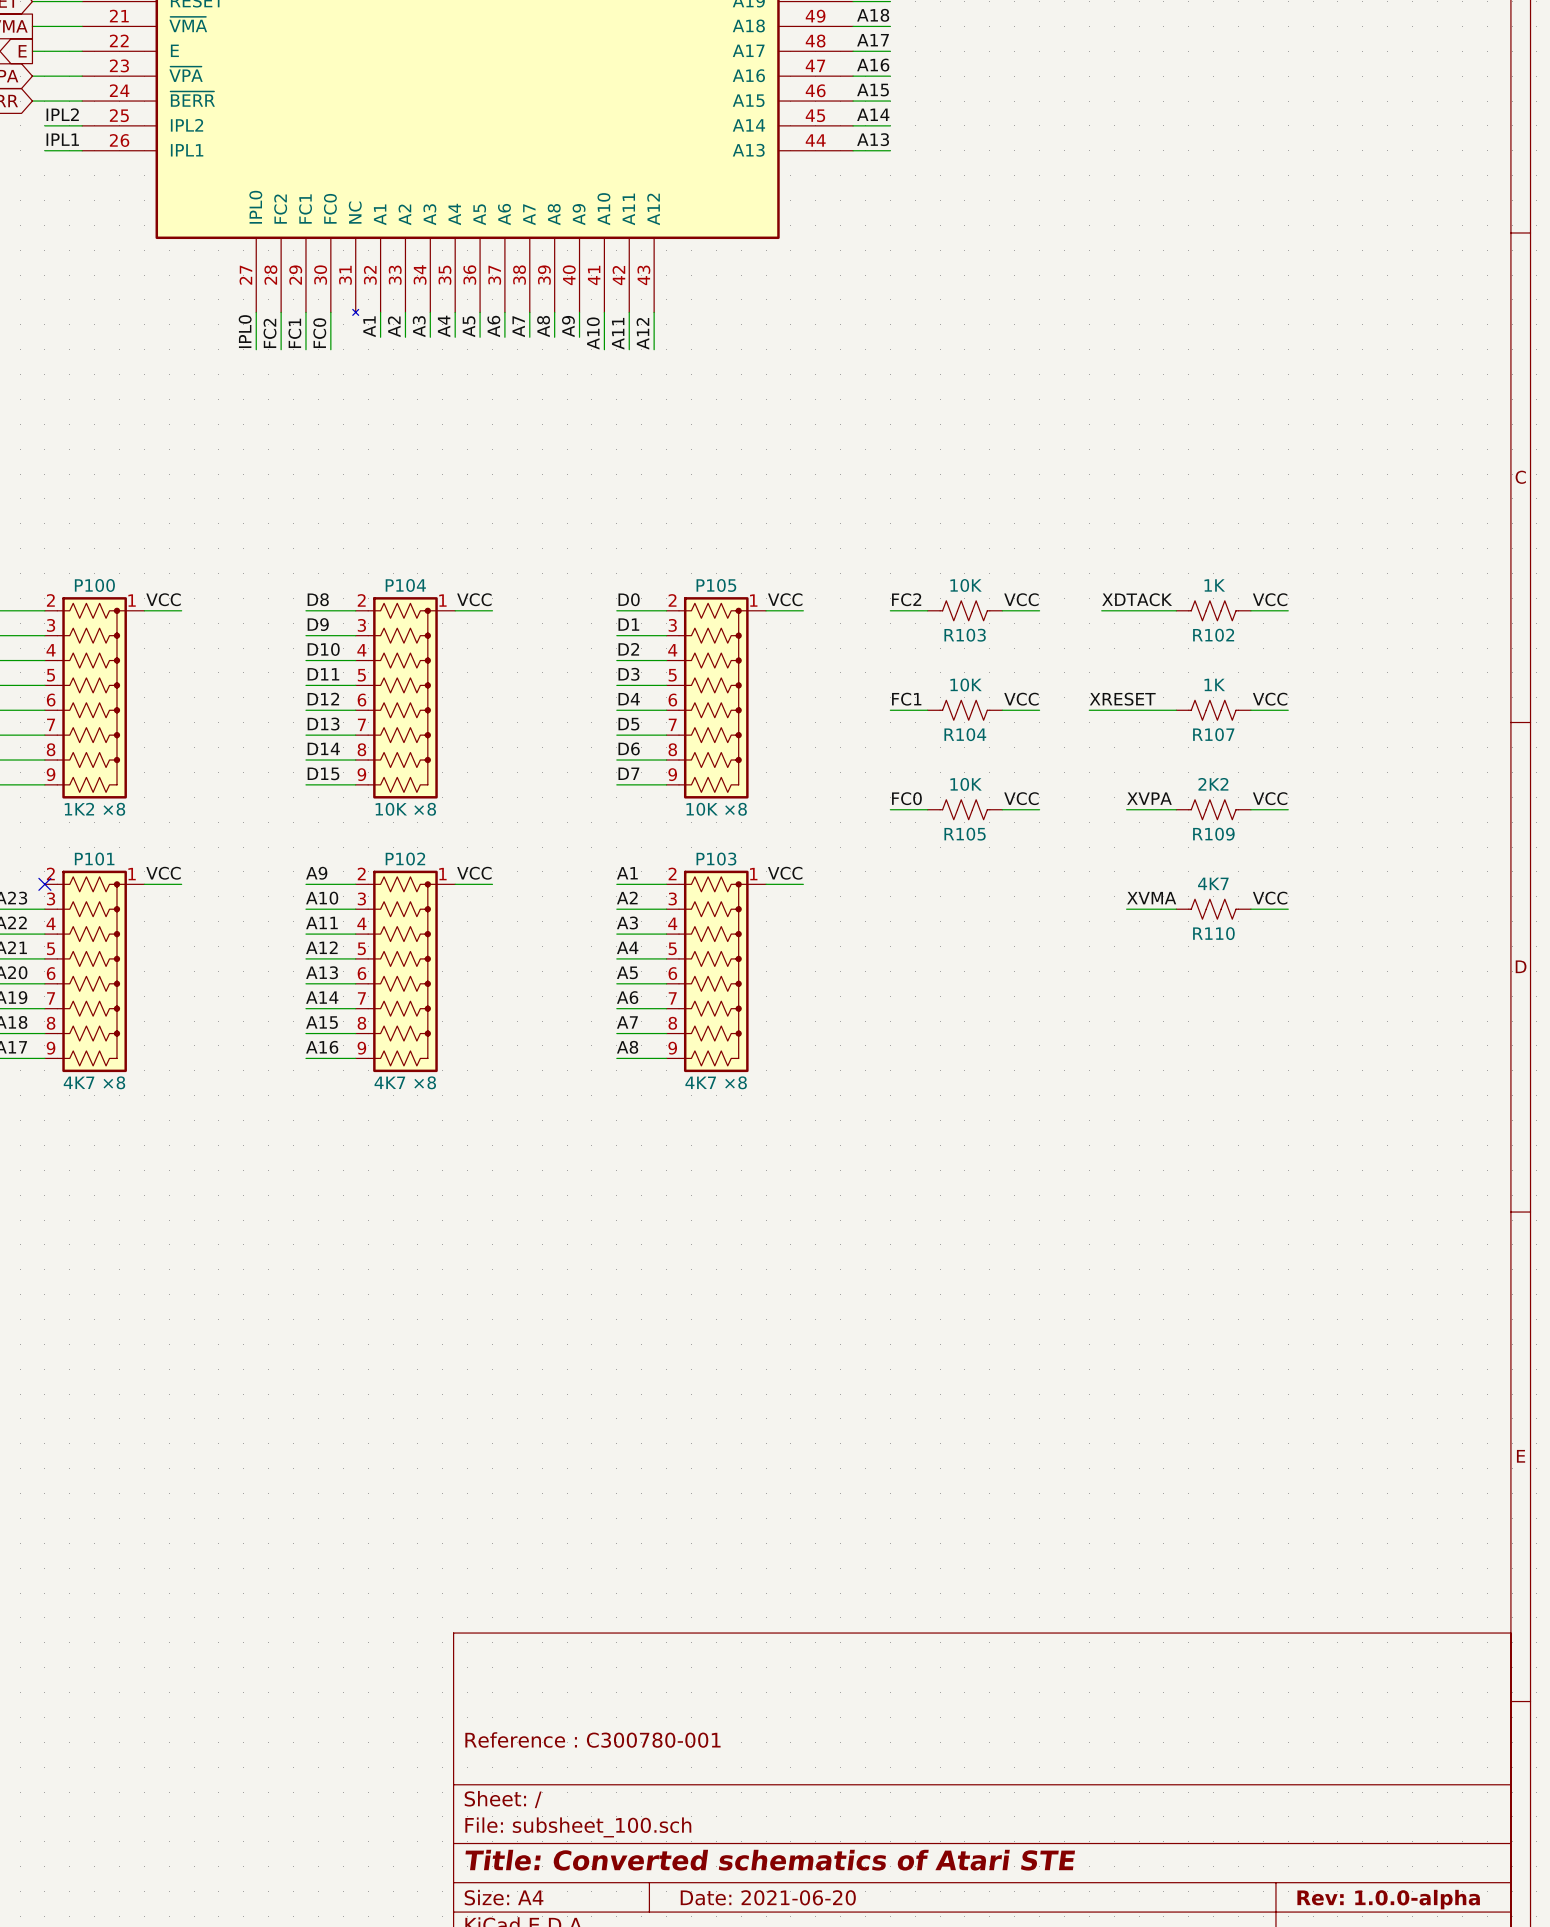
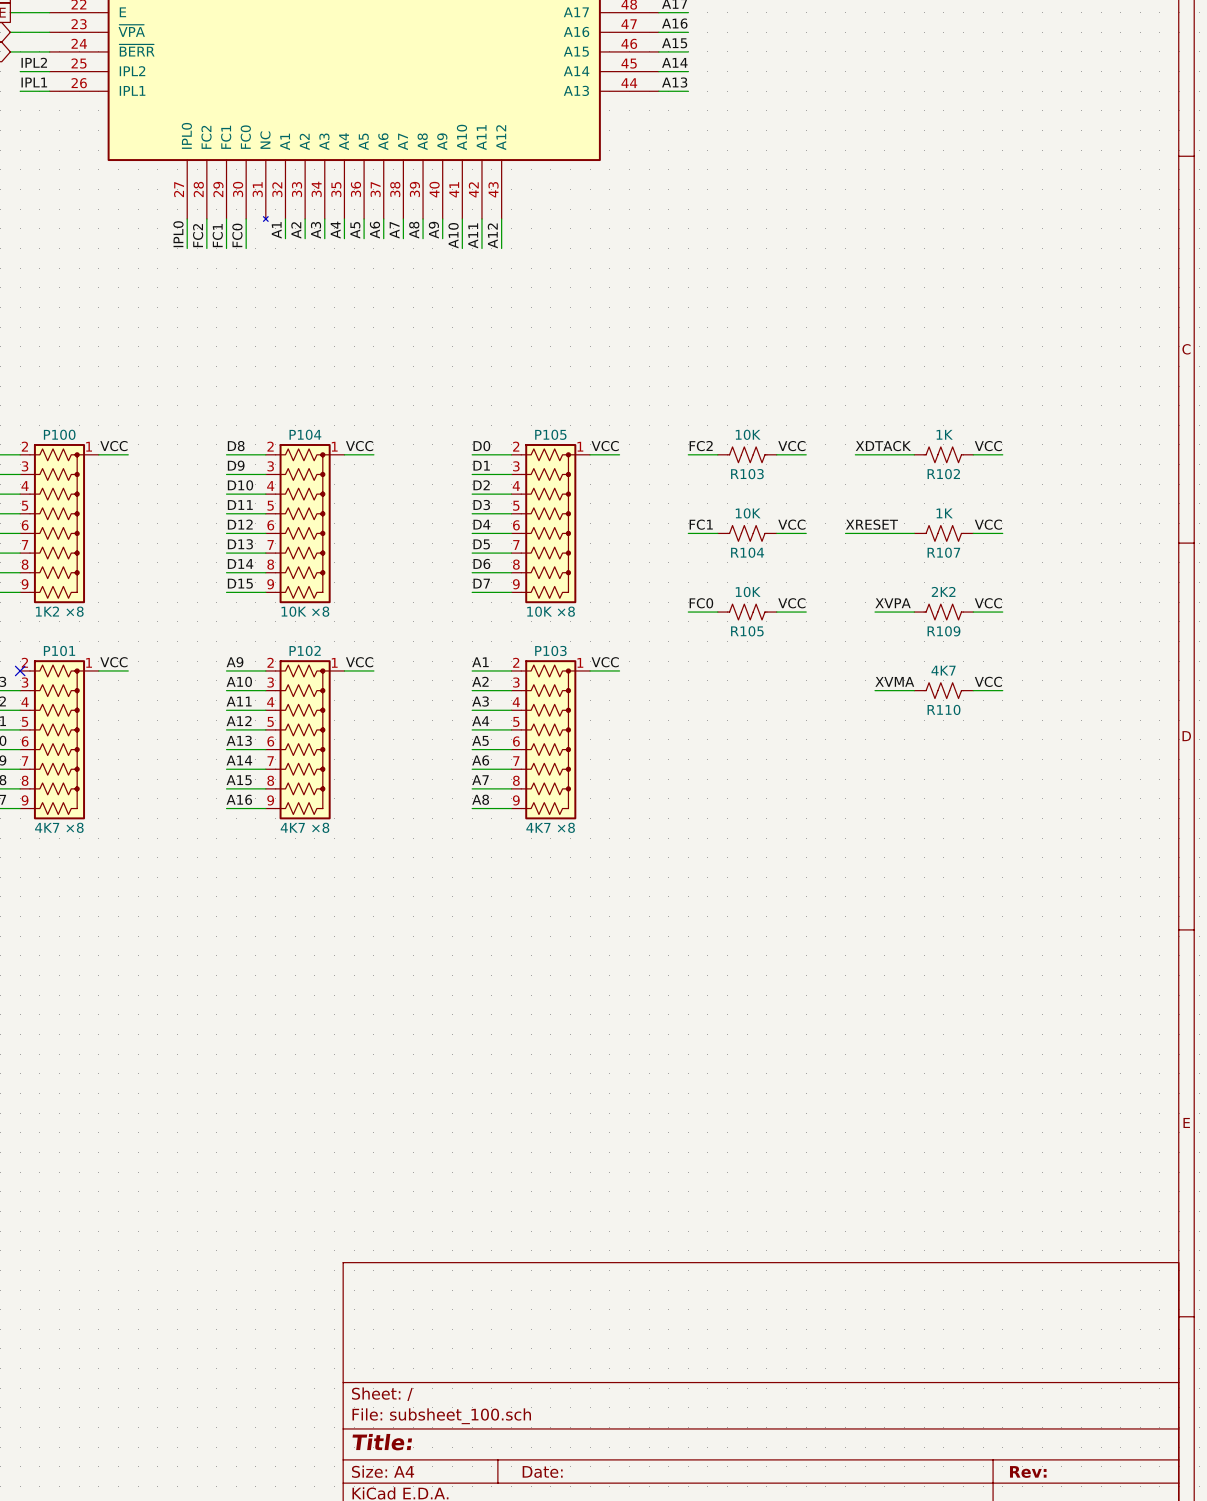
title block: Reference : C300780-001 (592, 1740) -> none
title block: Title: Converted schematics of Atari STE (770, 1860) -> Title: (382, 1442)
title block: Date: 2021-06-20 (768, 1897) -> Date: (542, 1471)
title block: Rev: 1.0.0-alpha (1388, 1899) -> Rev: (1028, 1471)

